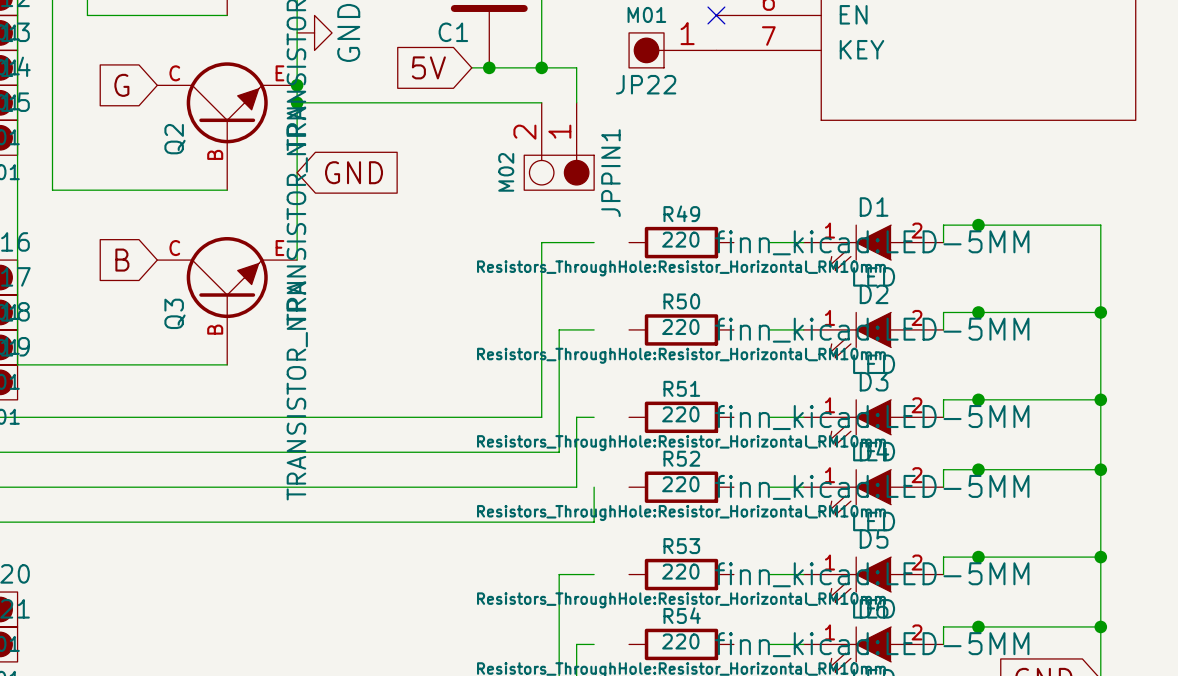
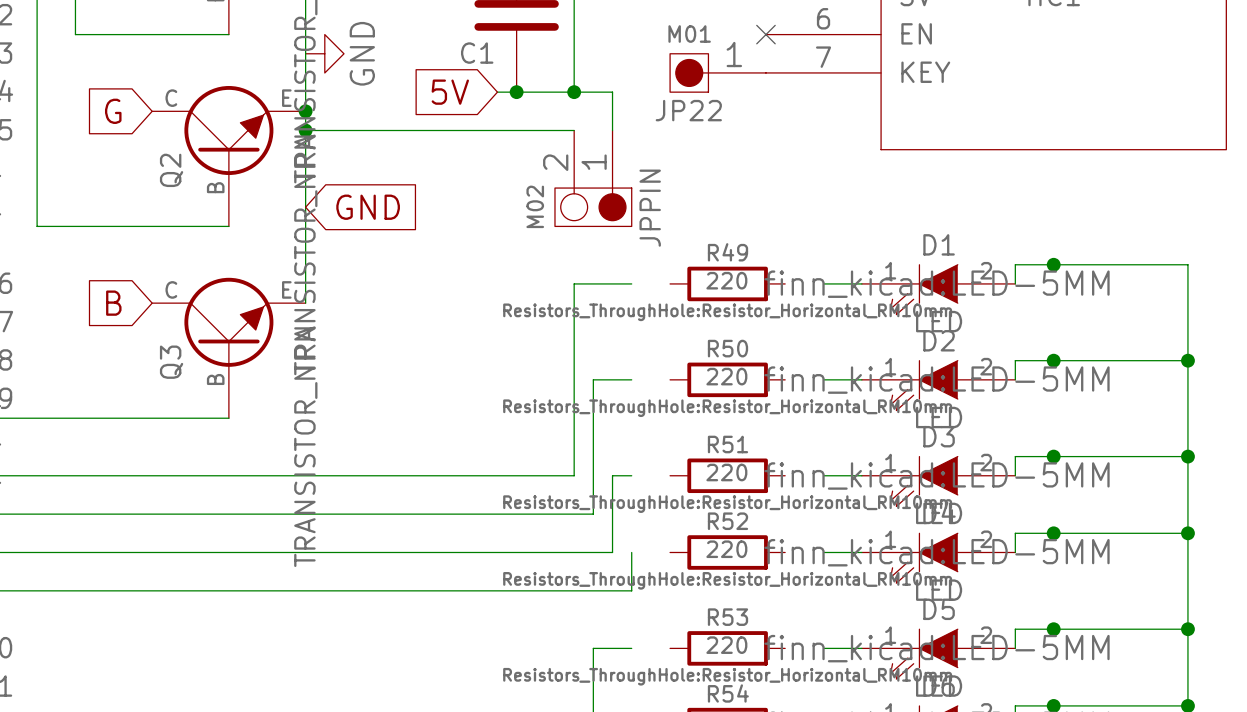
JPPIN1 name: JPPIN1 (610, 173) -> JPPIN (650, 208)

